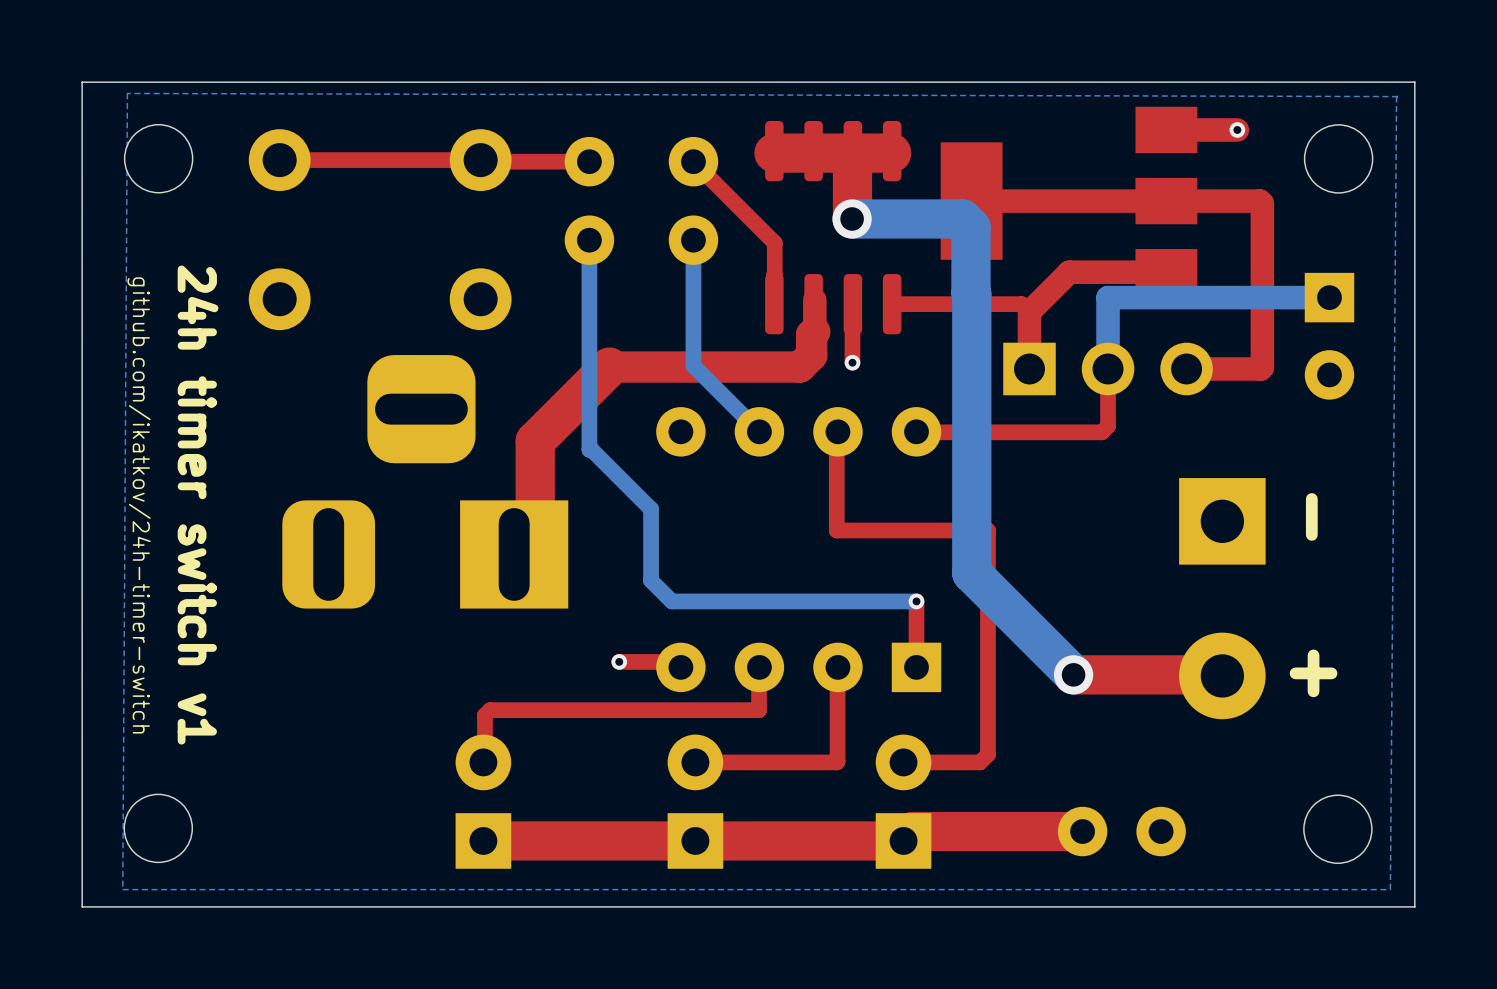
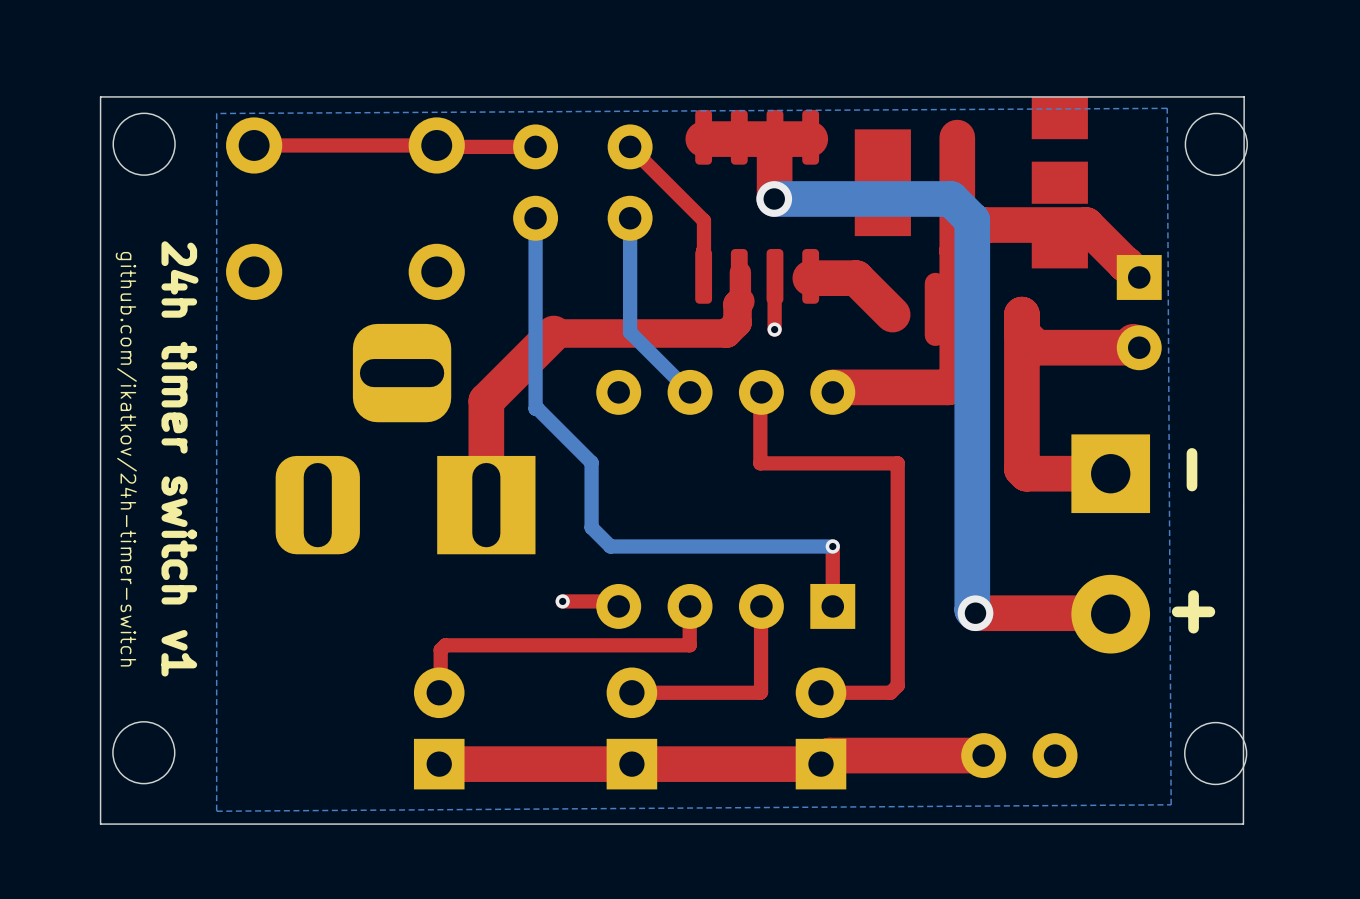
bottom zone outline: (127, 93) (1398, 96) (1396, 96) (1390, 889) (122, 889) (127, 93) -> (1167, 108) (1171, 804) (216, 811) (216, 113) (1167, 108)
top track: (1237, 129) (1166, 129) -> none
via: (1237, 129) -> none
top track: none -> (957, 137) (957, 378) (948, 387) (832, 387)
top track: (971, 201) (1259, 201) (1262, 203) (1262, 367) (1260, 368) (1186, 368) -> none
bottom track: (962, 218) (970, 227) (971, 573) (1070, 671) -> (874, 198) (950, 198) (972, 220) (972, 610)
top track: (1166, 272) (1069, 272) (1029, 312) (1021, 304) (892, 304) -> none
top track: none -> (957, 250) (983, 225) (1086, 225) (1139, 277)
bottom track: (1329, 297) (1108, 297) (1108, 368) -> none
top track: none -> (810, 278) (856, 278) (892, 314)
part position: (1329, 336) -> (1139, 312)
top track: none -> (1021, 314) (1021, 469) (1026, 473) (1110, 473)
top track: none -> (1021, 333) (1036, 347) (1139, 347) (1133, 341)
top track: (1108, 368) (1108, 426) (1101, 432) (916, 431) -> none
part: (1108, 368) -> none
part position: (425, 481) -> (405, 439)
top track: (836, 509) (836, 530) (987, 530) -> (760, 463) (897, 463) (897, 482)
board edge: (1368, 906) (1414, 906) (1414, 82) (82, 82) (82, 906) (110, 906) -> (1243, 824) (1244, 96) (100, 96) (100, 824)

